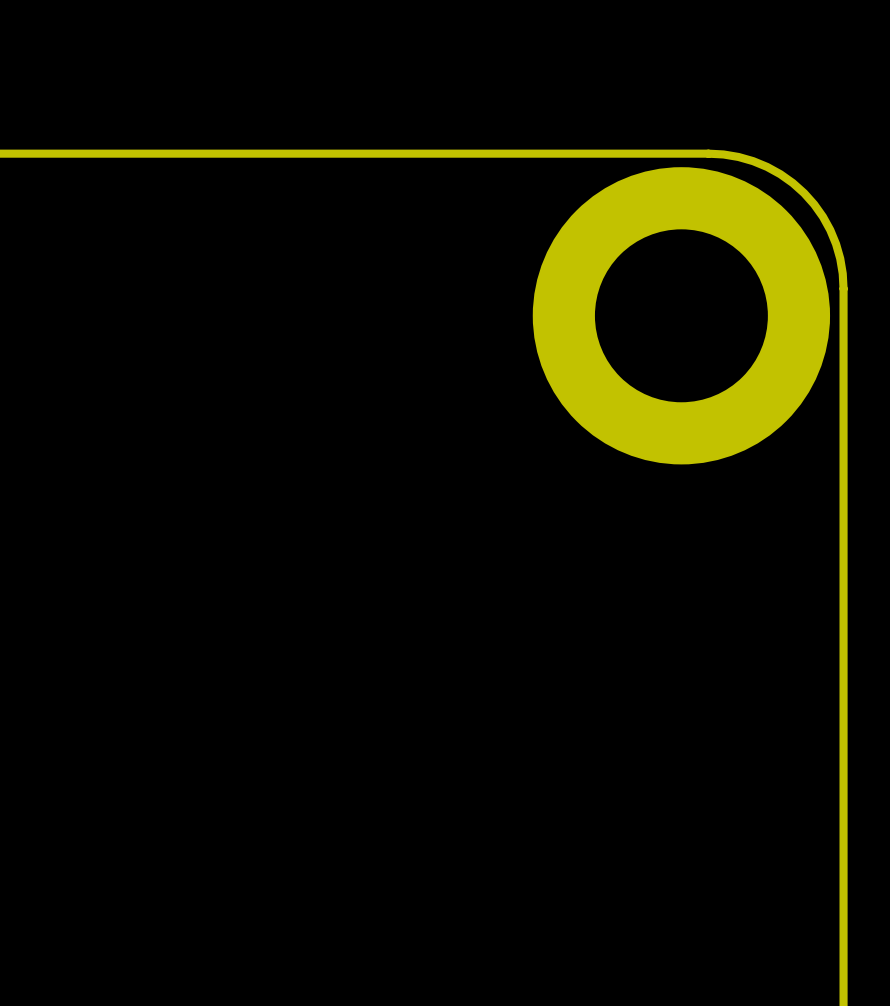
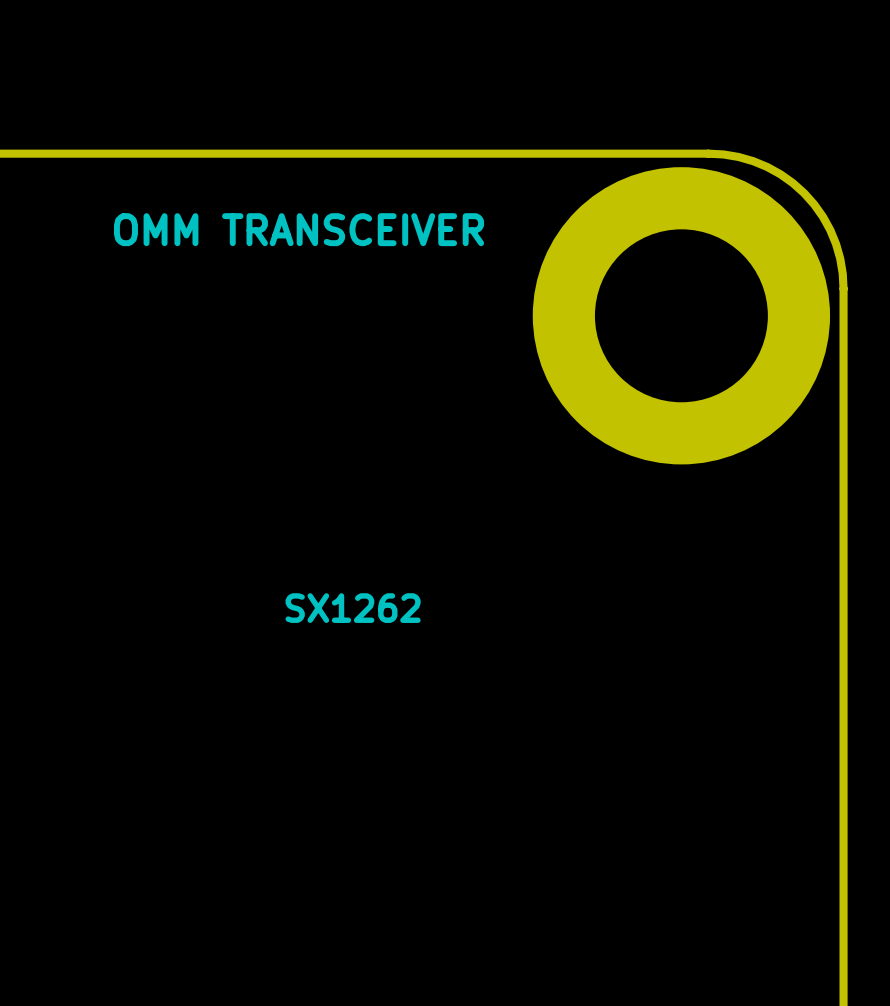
text: none -> OMM TRANSCEIVER (299, 229)
text: none -> SX1262 (353, 608)

